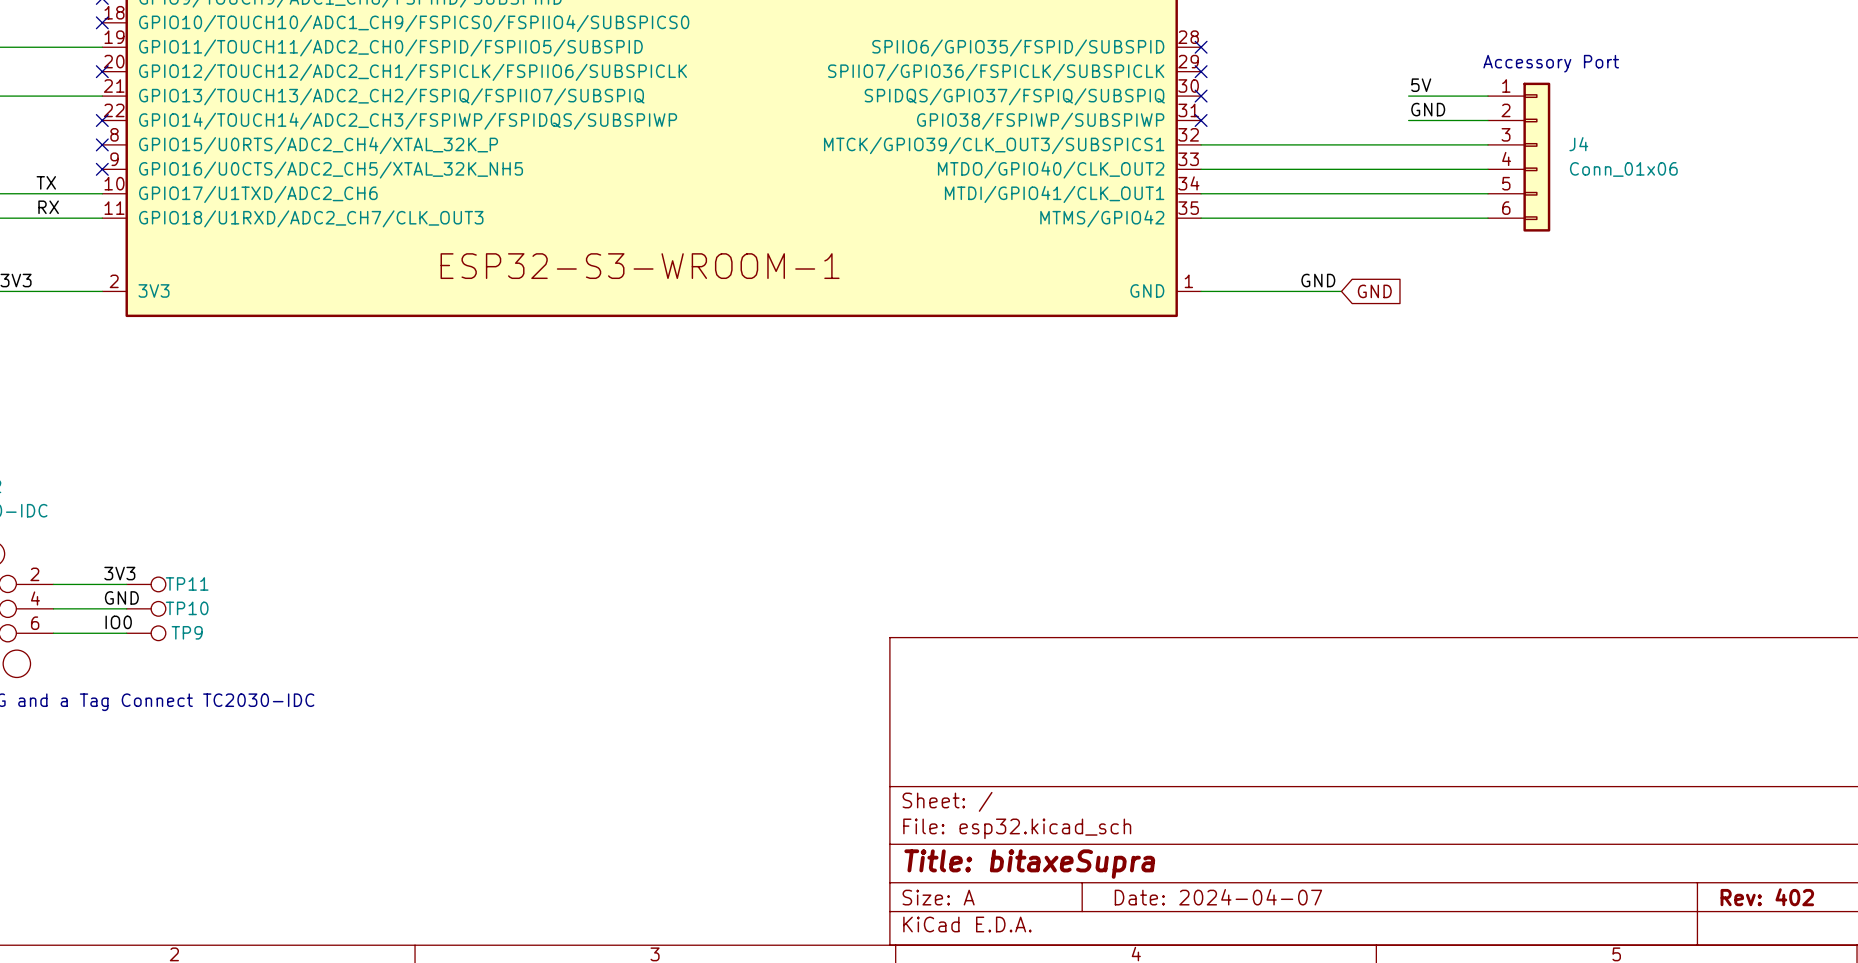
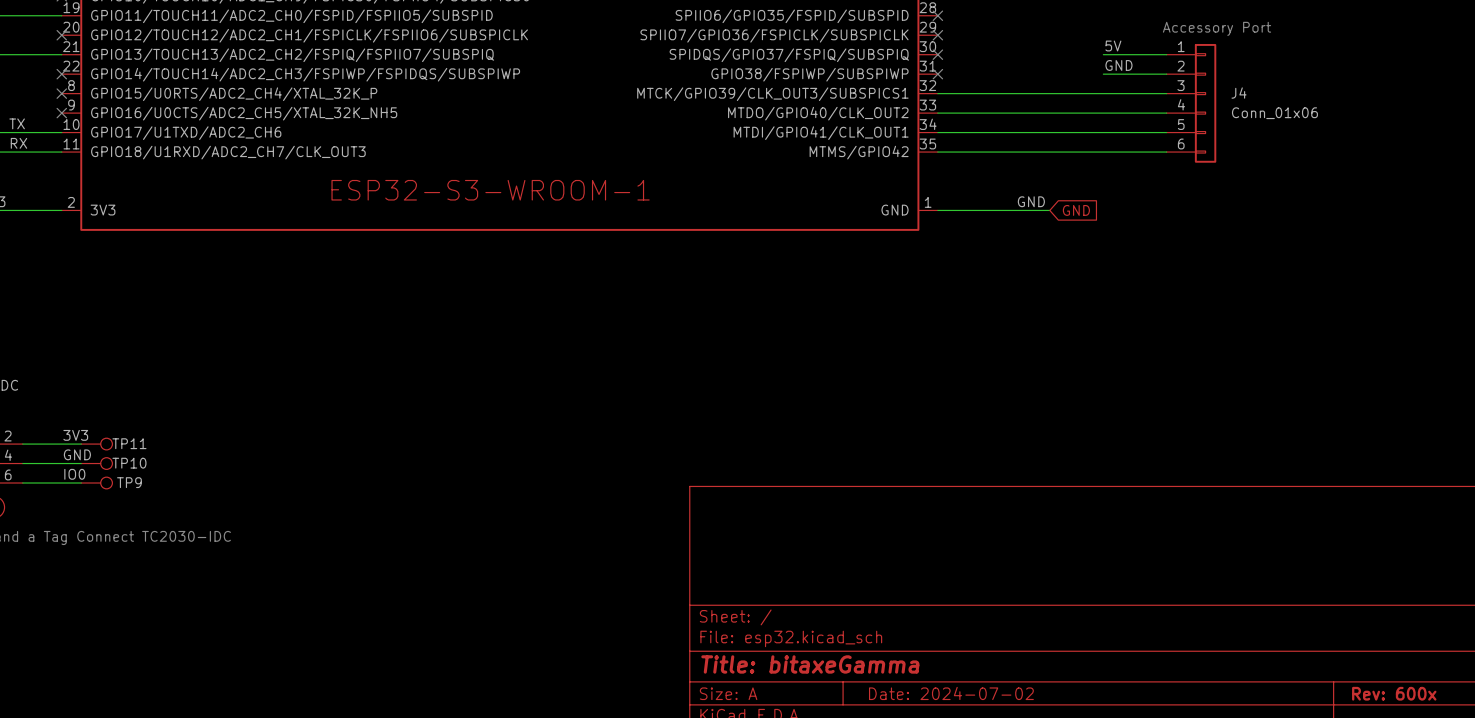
title block: Title: bitaxeSupra (1029, 864) -> Title: bitaxeGamma (810, 664)
title block: Date: 2024-04-07 (1218, 897) -> Date: 2024-07-02 (951, 693)
title block: Rev: 402 (1767, 897) -> Rev: 600x (1394, 693)

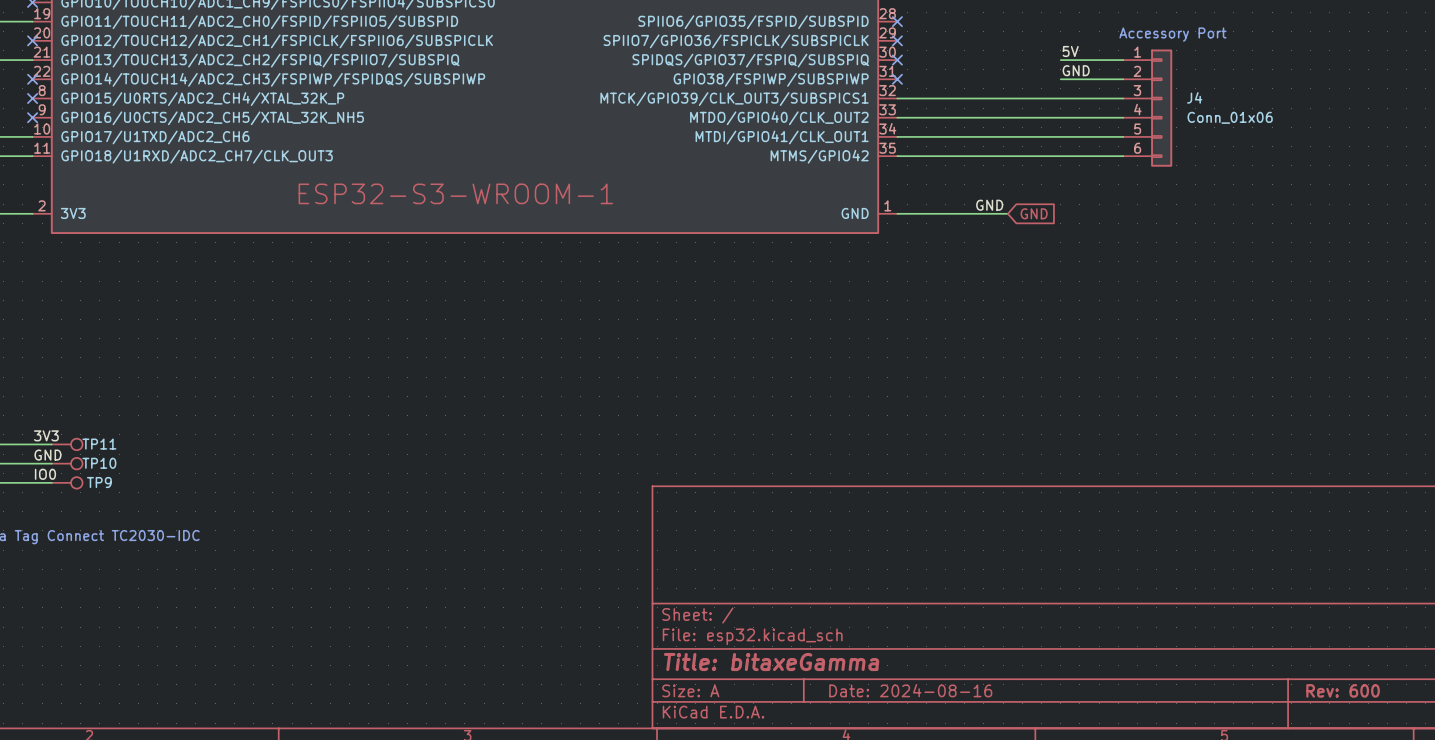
title block: Date: 2024-07-02 (951, 693) -> Date: 2024-08-16 (910, 690)
title block: Rev: 600x (1394, 693) -> Rev: 600 (1343, 690)

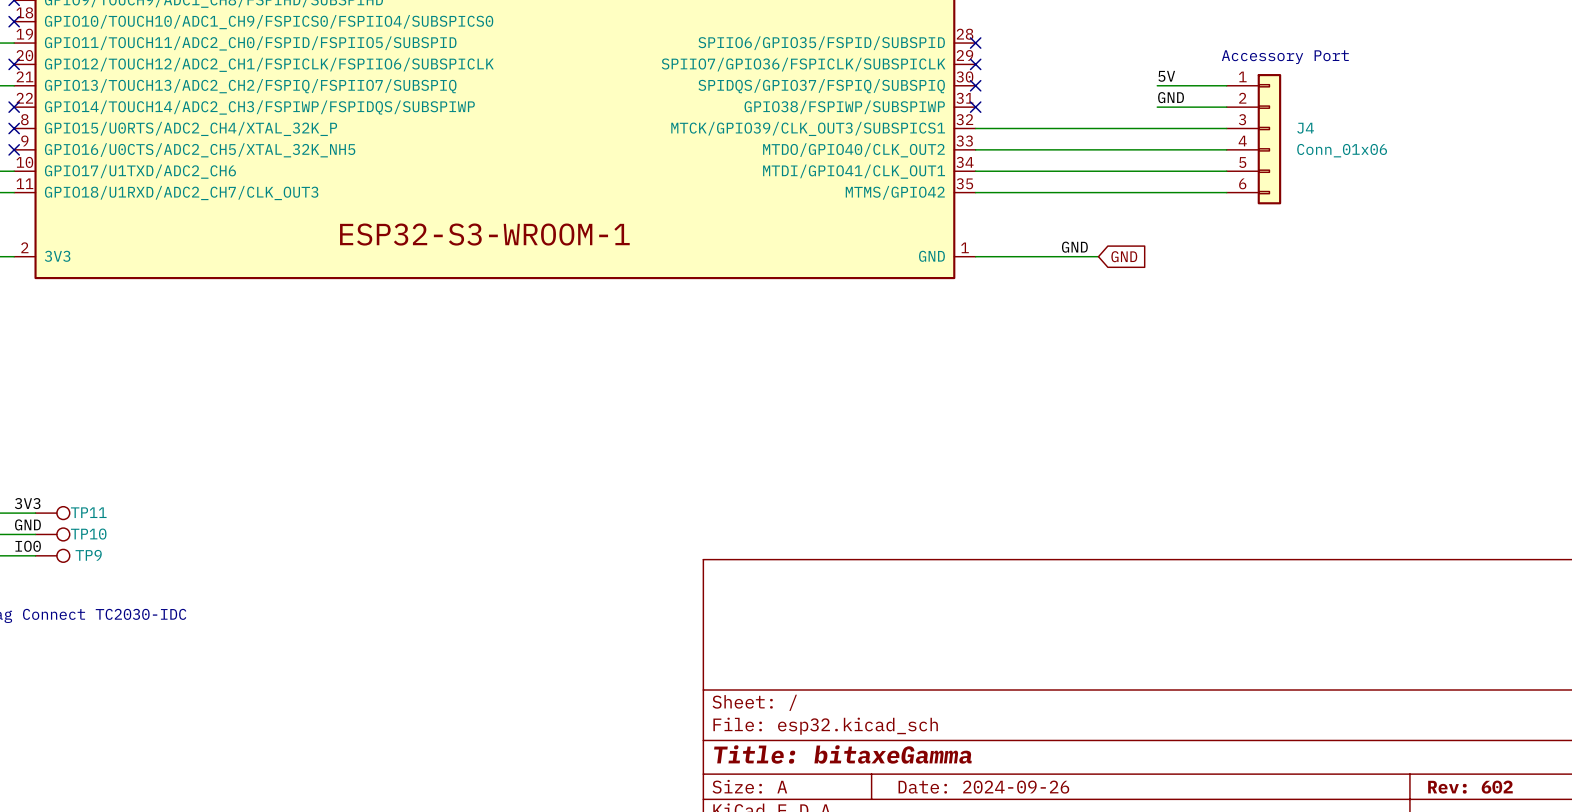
title block: Date: 2024-08-16 (910, 690) -> Date: 2024-09-26 (983, 787)
title block: Rev: 600 (1343, 690) -> Rev: 602 (1470, 787)

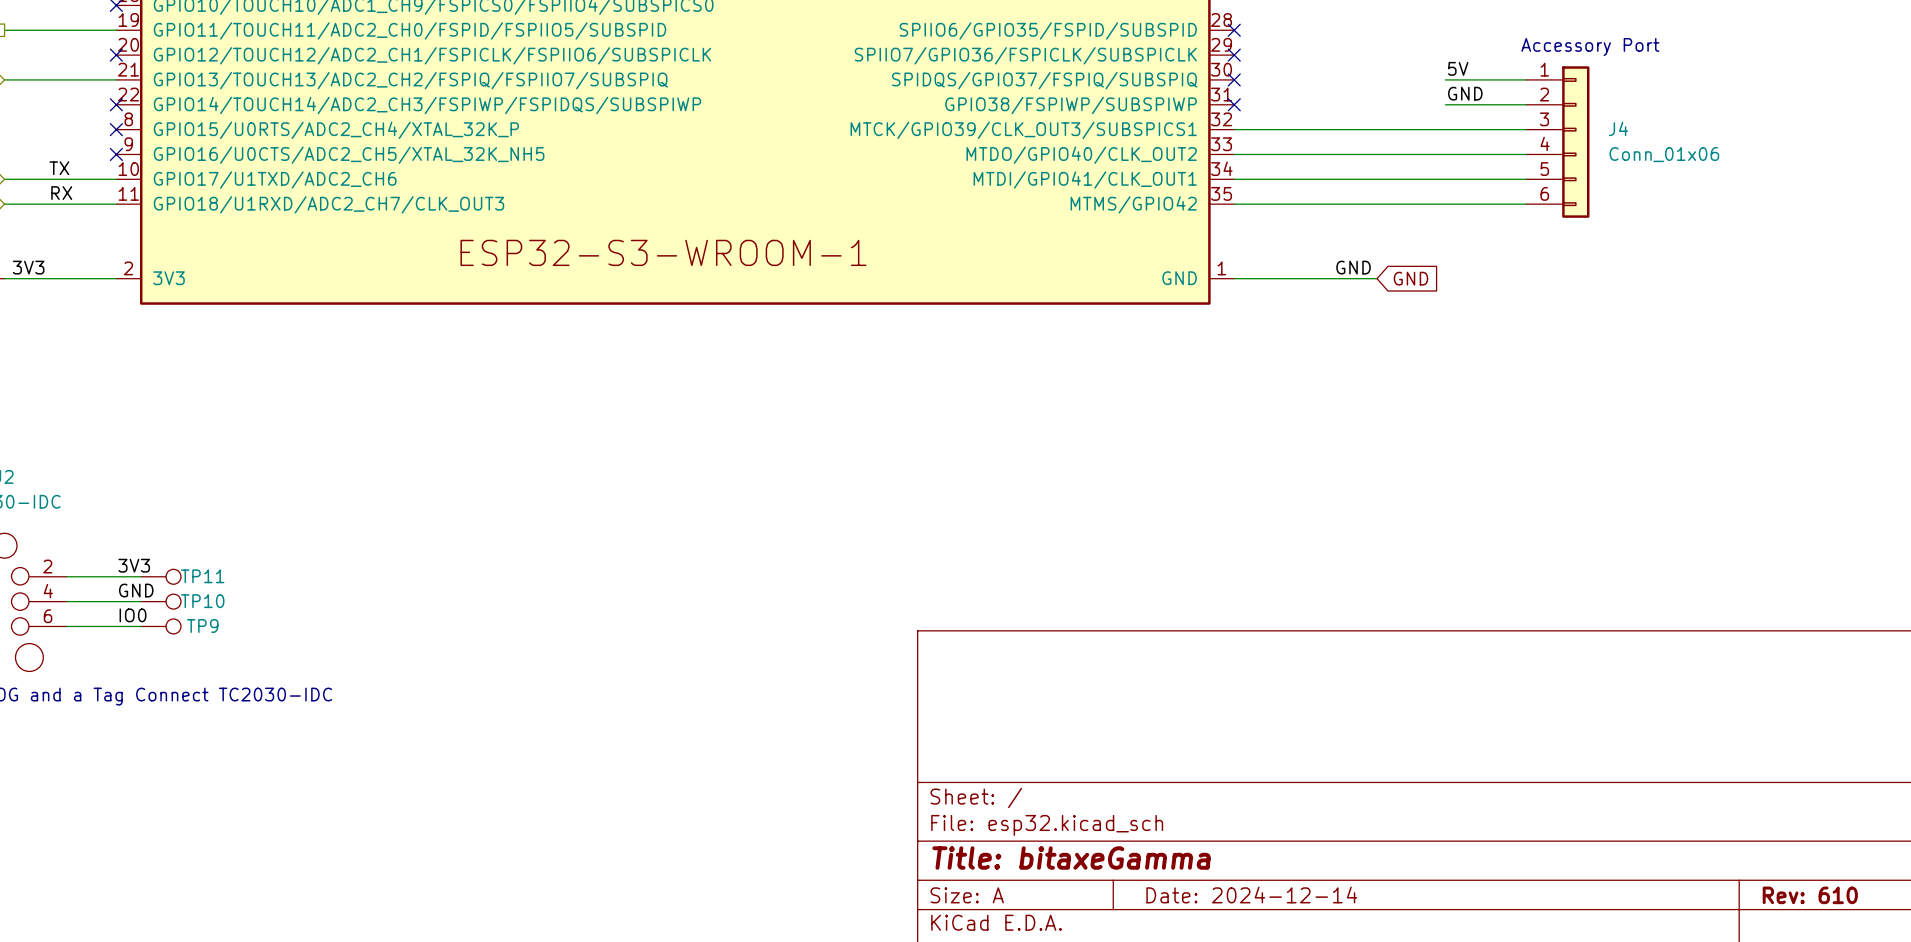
title block: Date: 2024-09-26 (983, 787) -> Date: 2024-12-14 (1251, 895)
title block: Rev: 602 (1470, 787) -> Rev: 610 (1810, 895)

